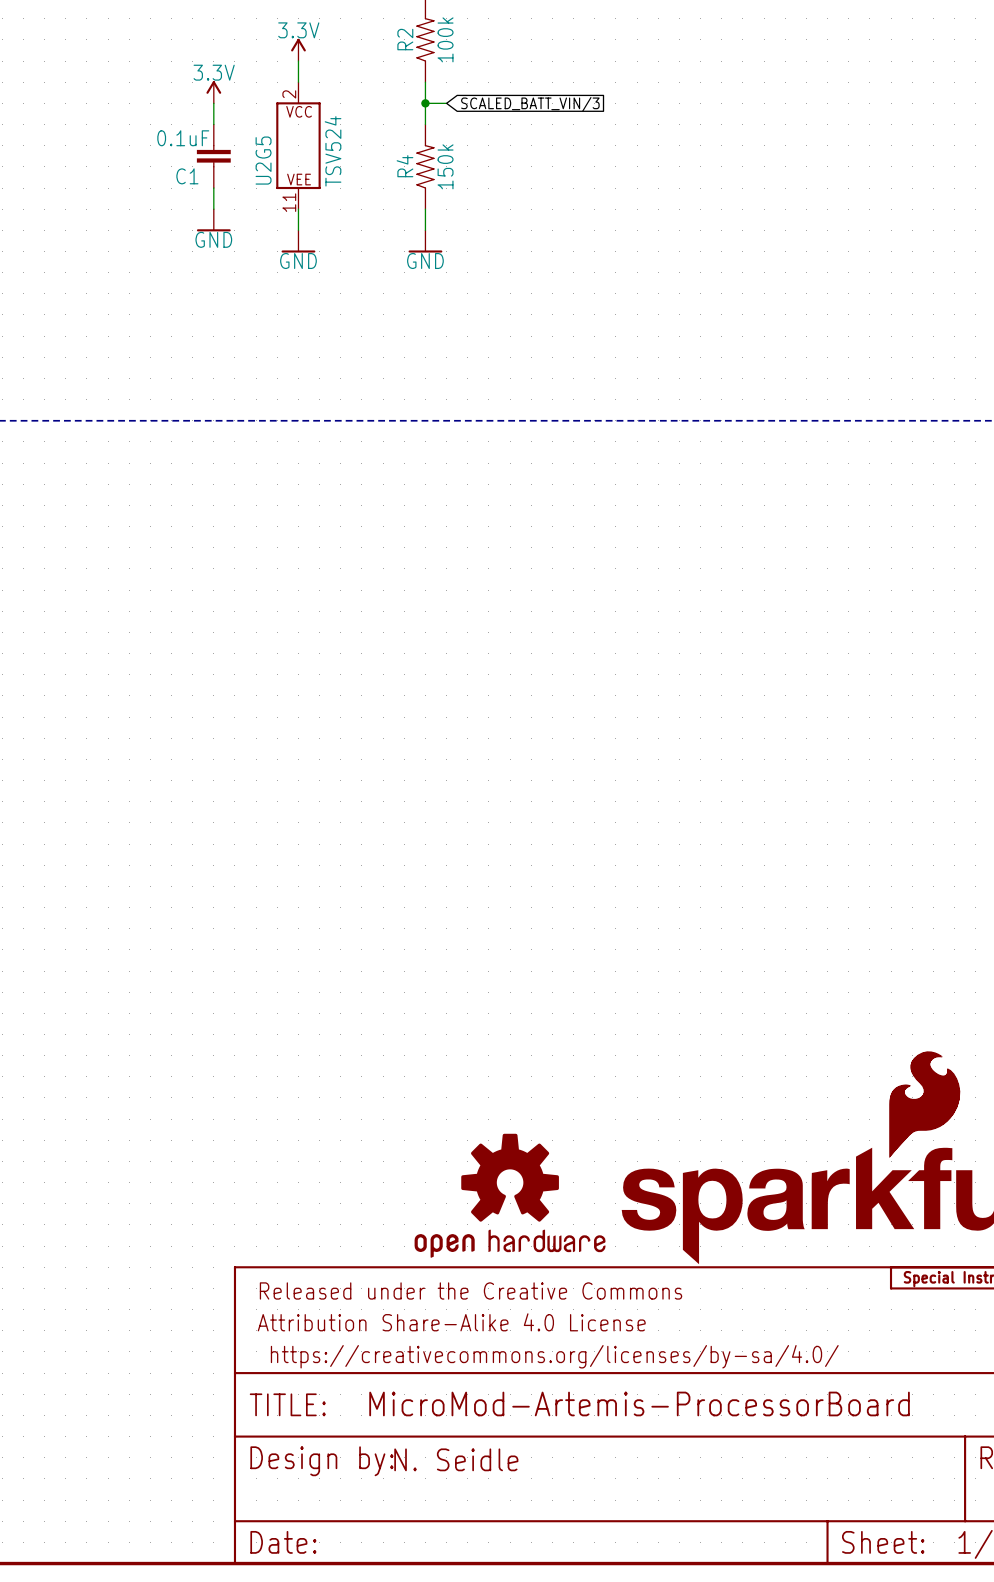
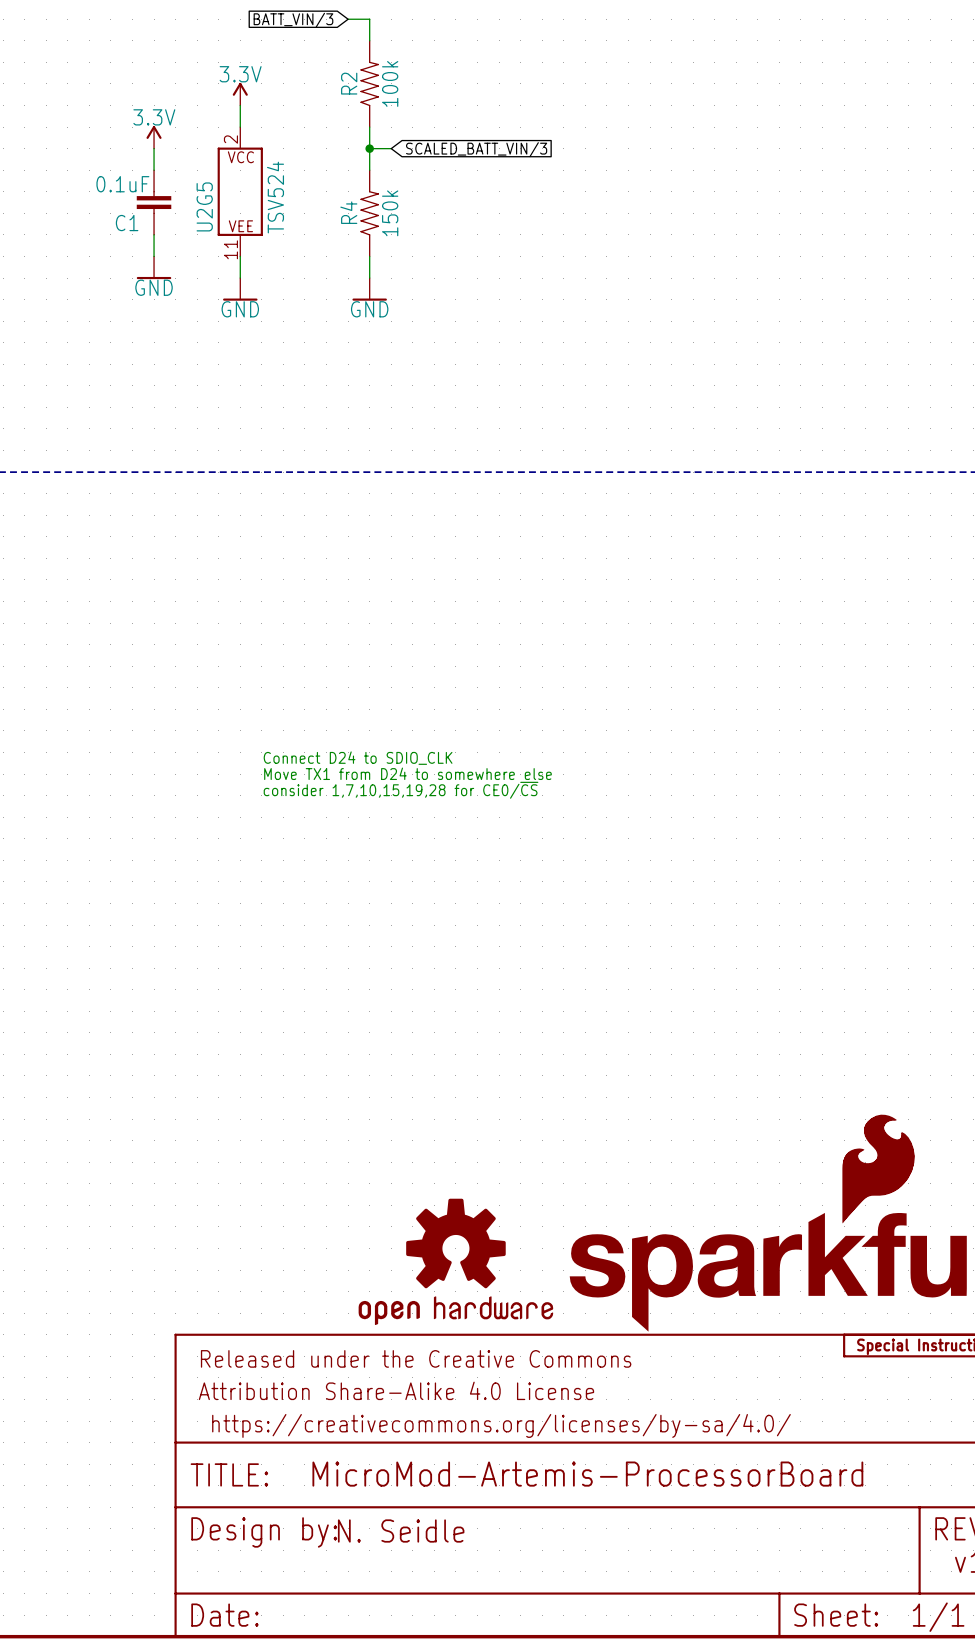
text: none -> Connect D24 to SDIO_CLK (358, 758)
text: none -> Move TX1 from D24 to somewhere else (407, 773)
text: none -> consider 1,7,10,15,19,28 for CE0/~{CS} (401, 790)

